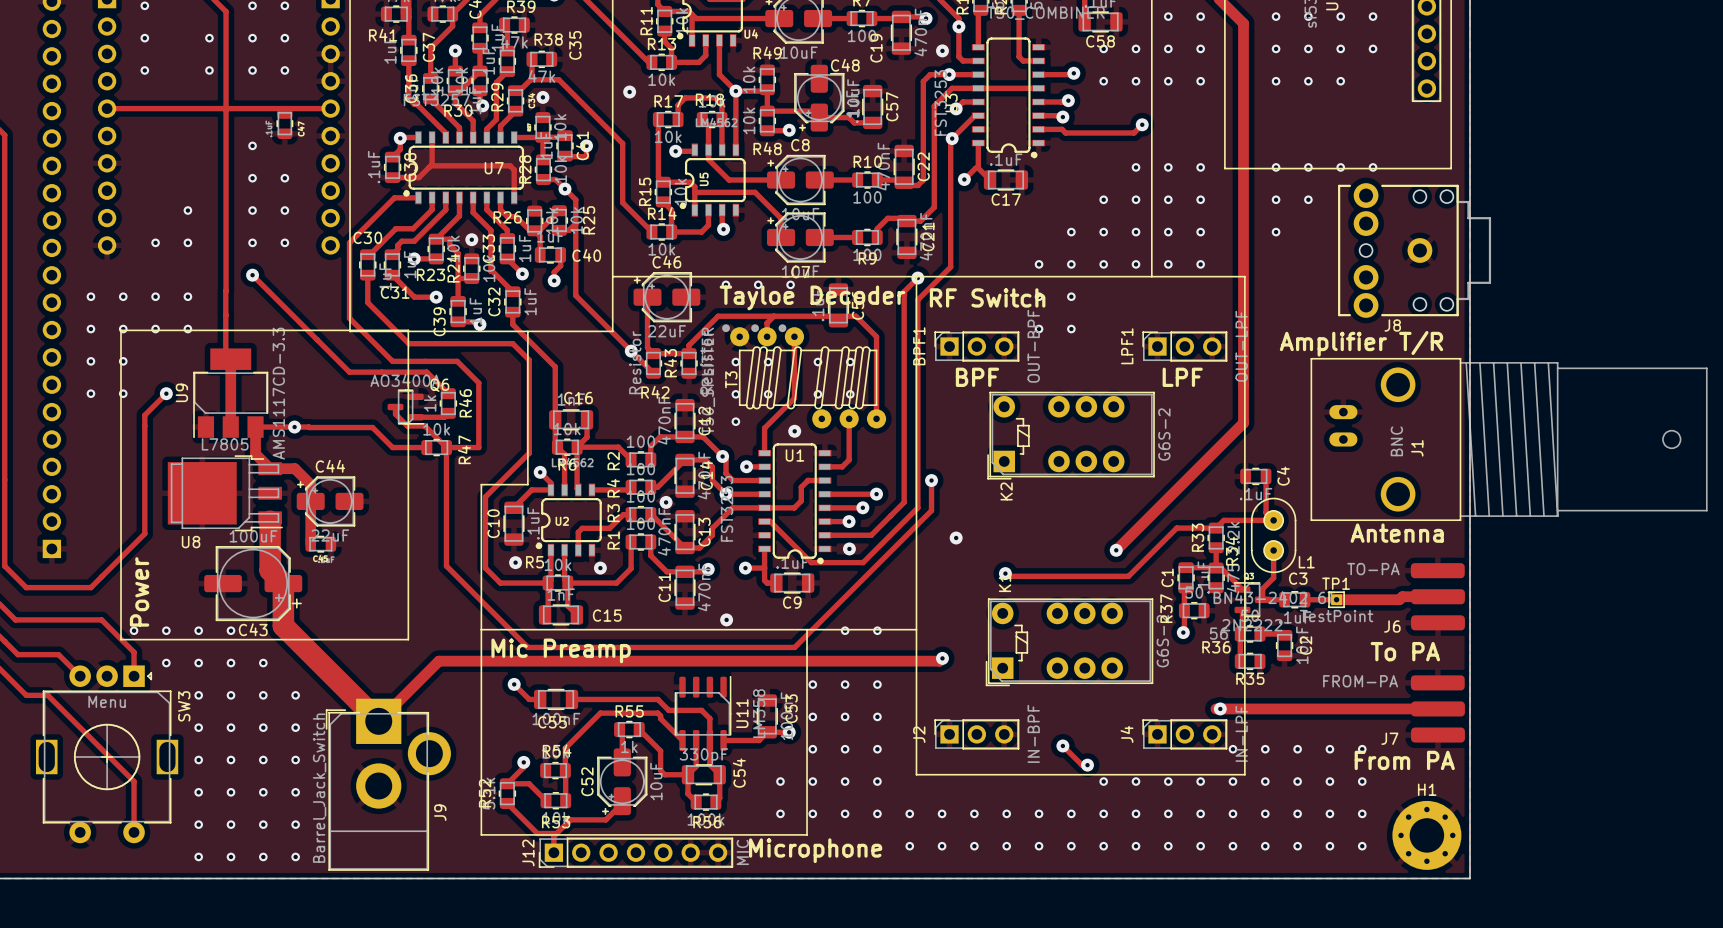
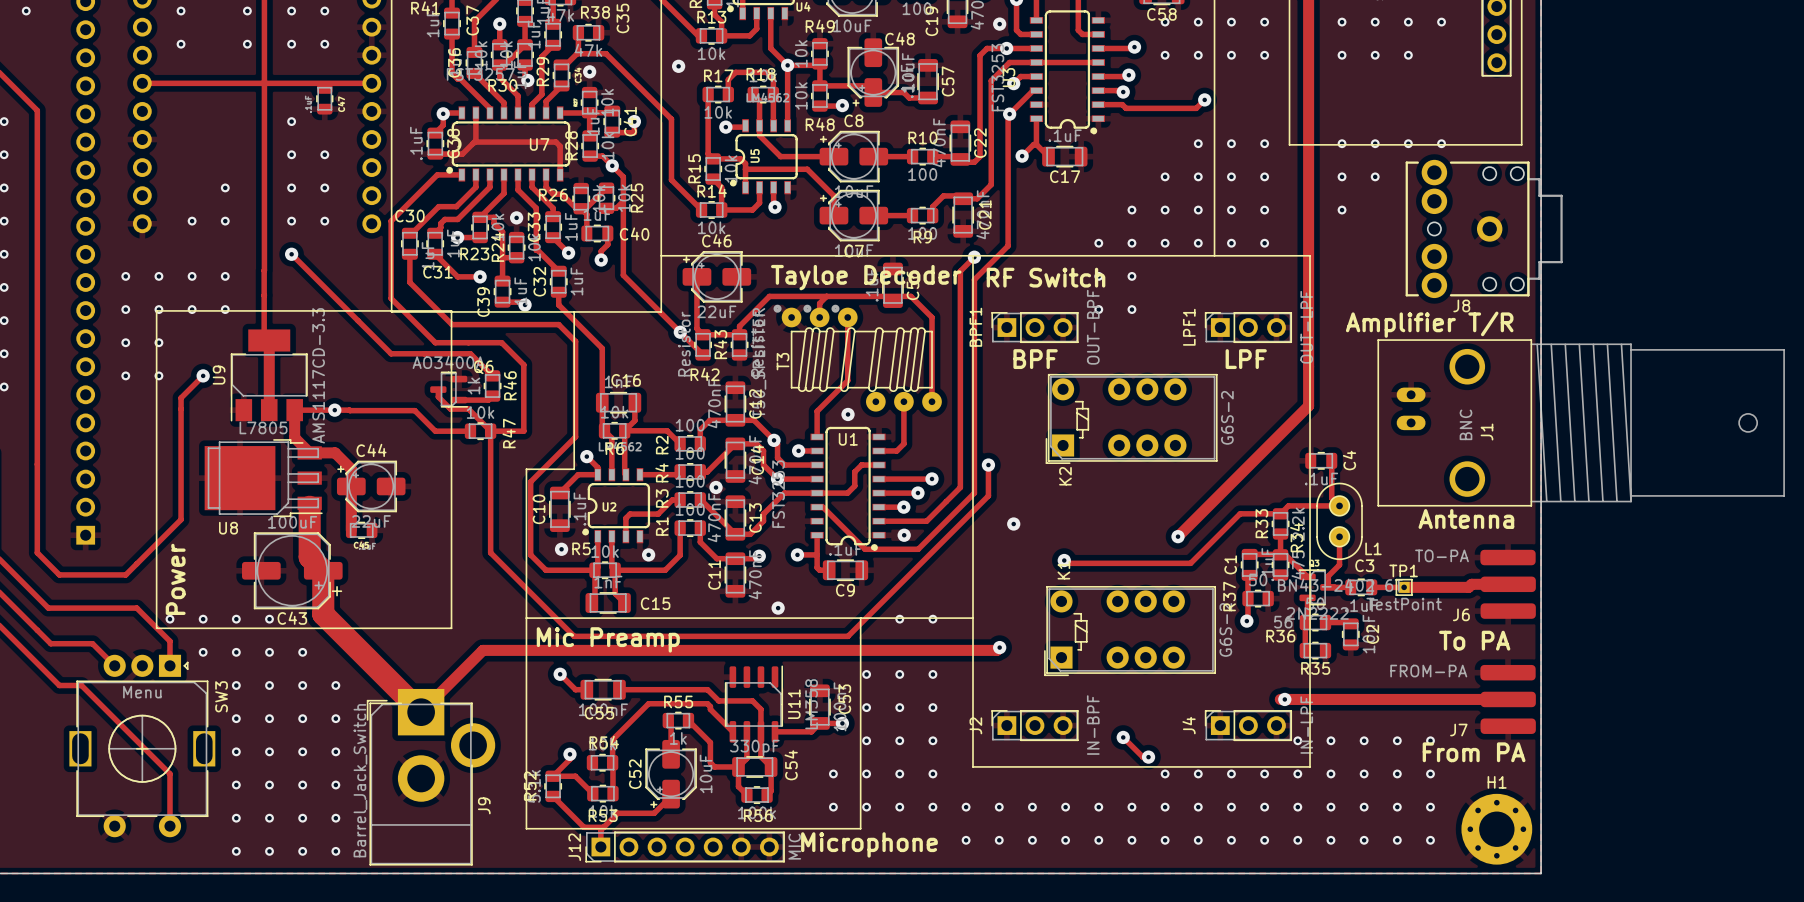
via: (725, 284) -> none
via: (758, 284) -> none
via: (790, 284) -> none
via: (735, 362) -> none
via: (768, 362) -> none
via: (817, 362) -> none
via: (850, 362) -> none
via: (735, 394) -> none
via: (768, 394) -> none
via: (817, 394) -> none
via: (850, 394) -> none
via: (735, 421) -> none

